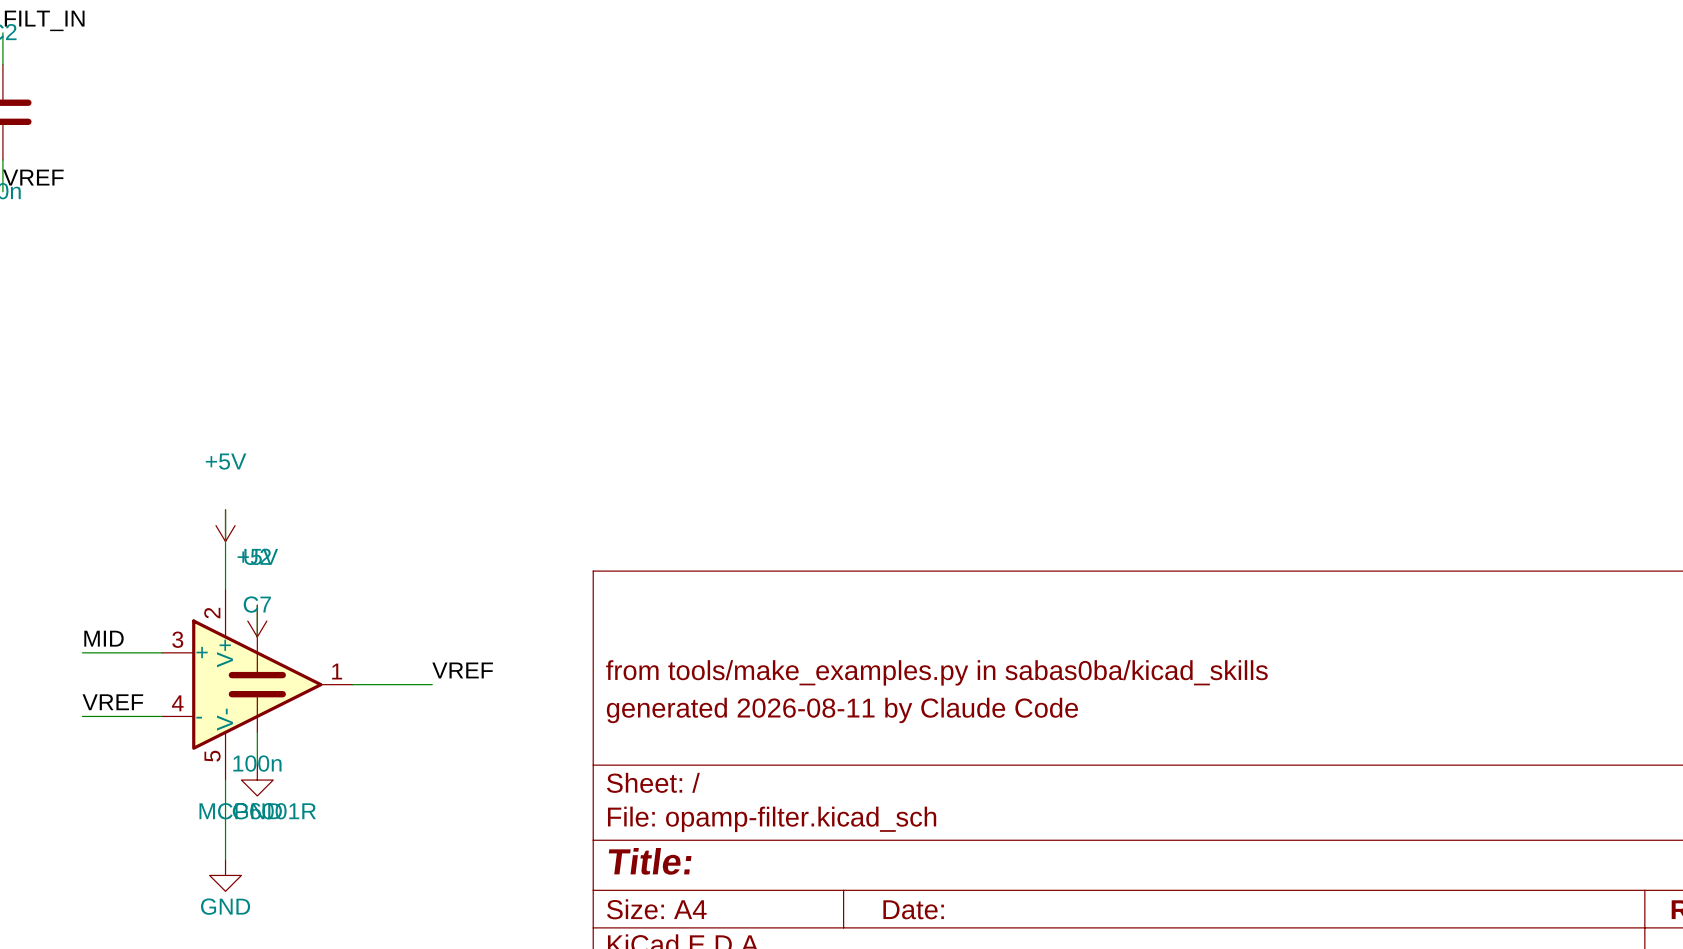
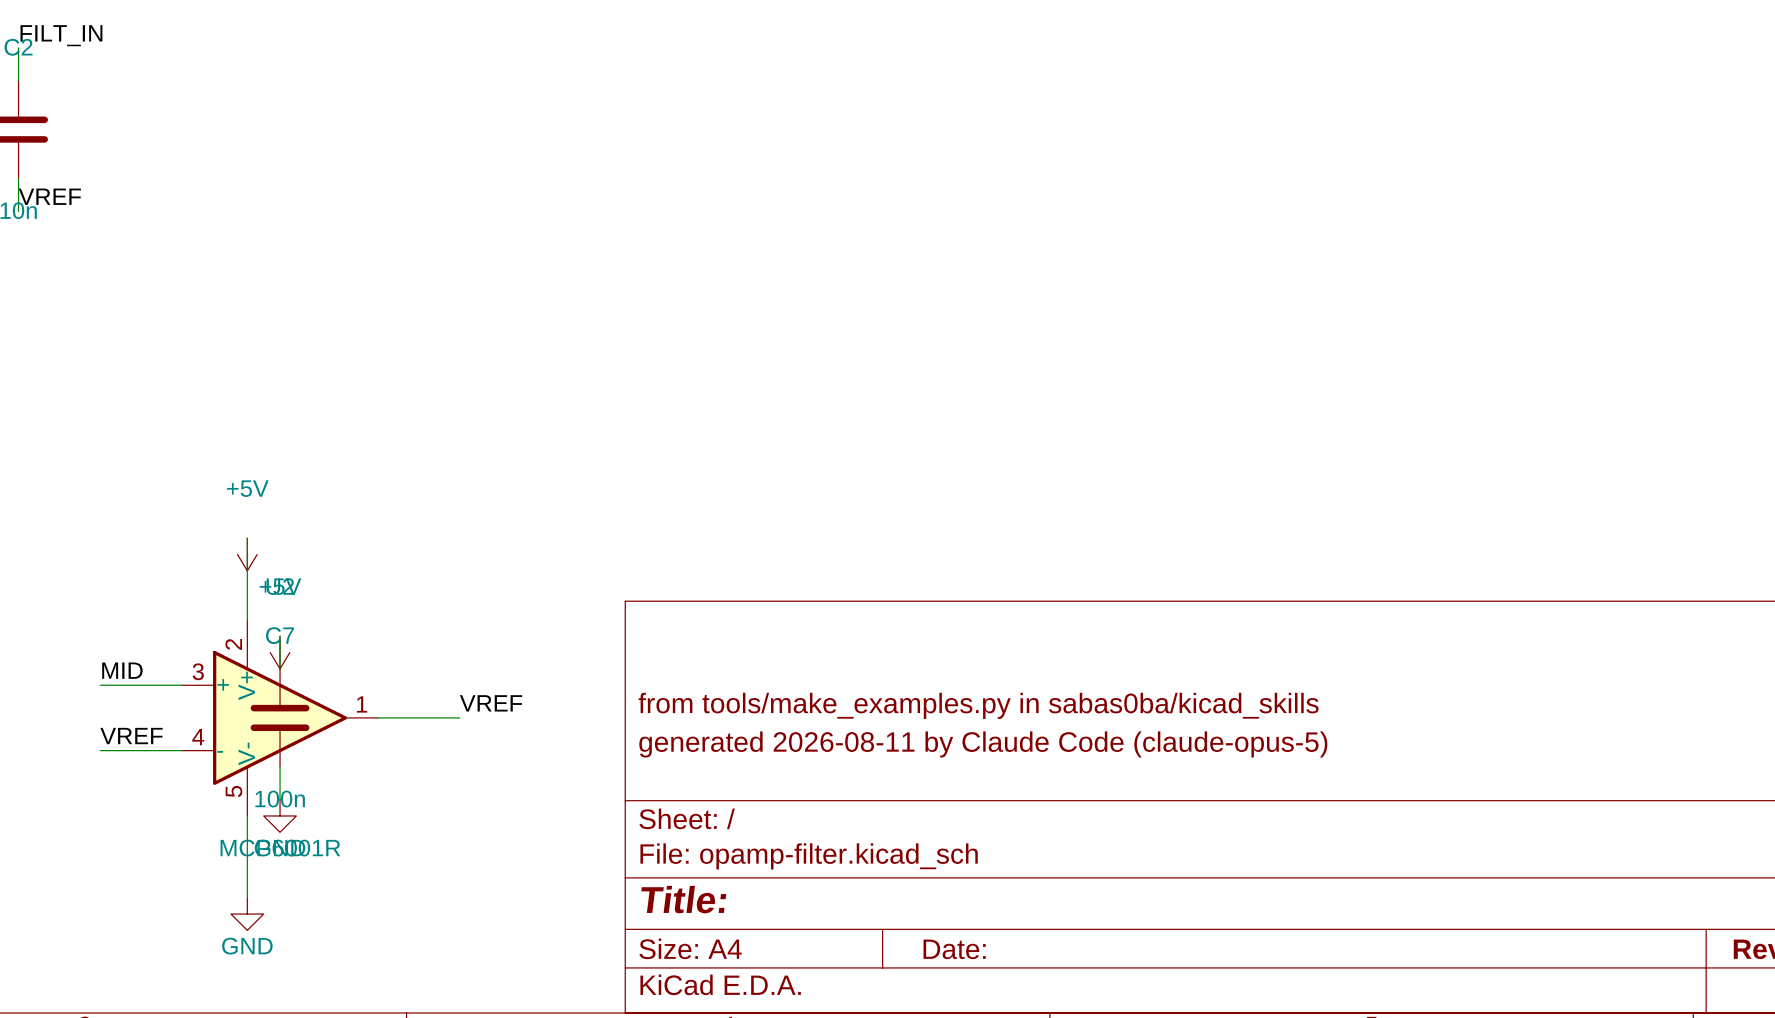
title block: generated 2026-08-11 by Claude Code (842, 710) -> generated 2026-08-11 by Claude Code (claude-opus-5) (983, 744)

